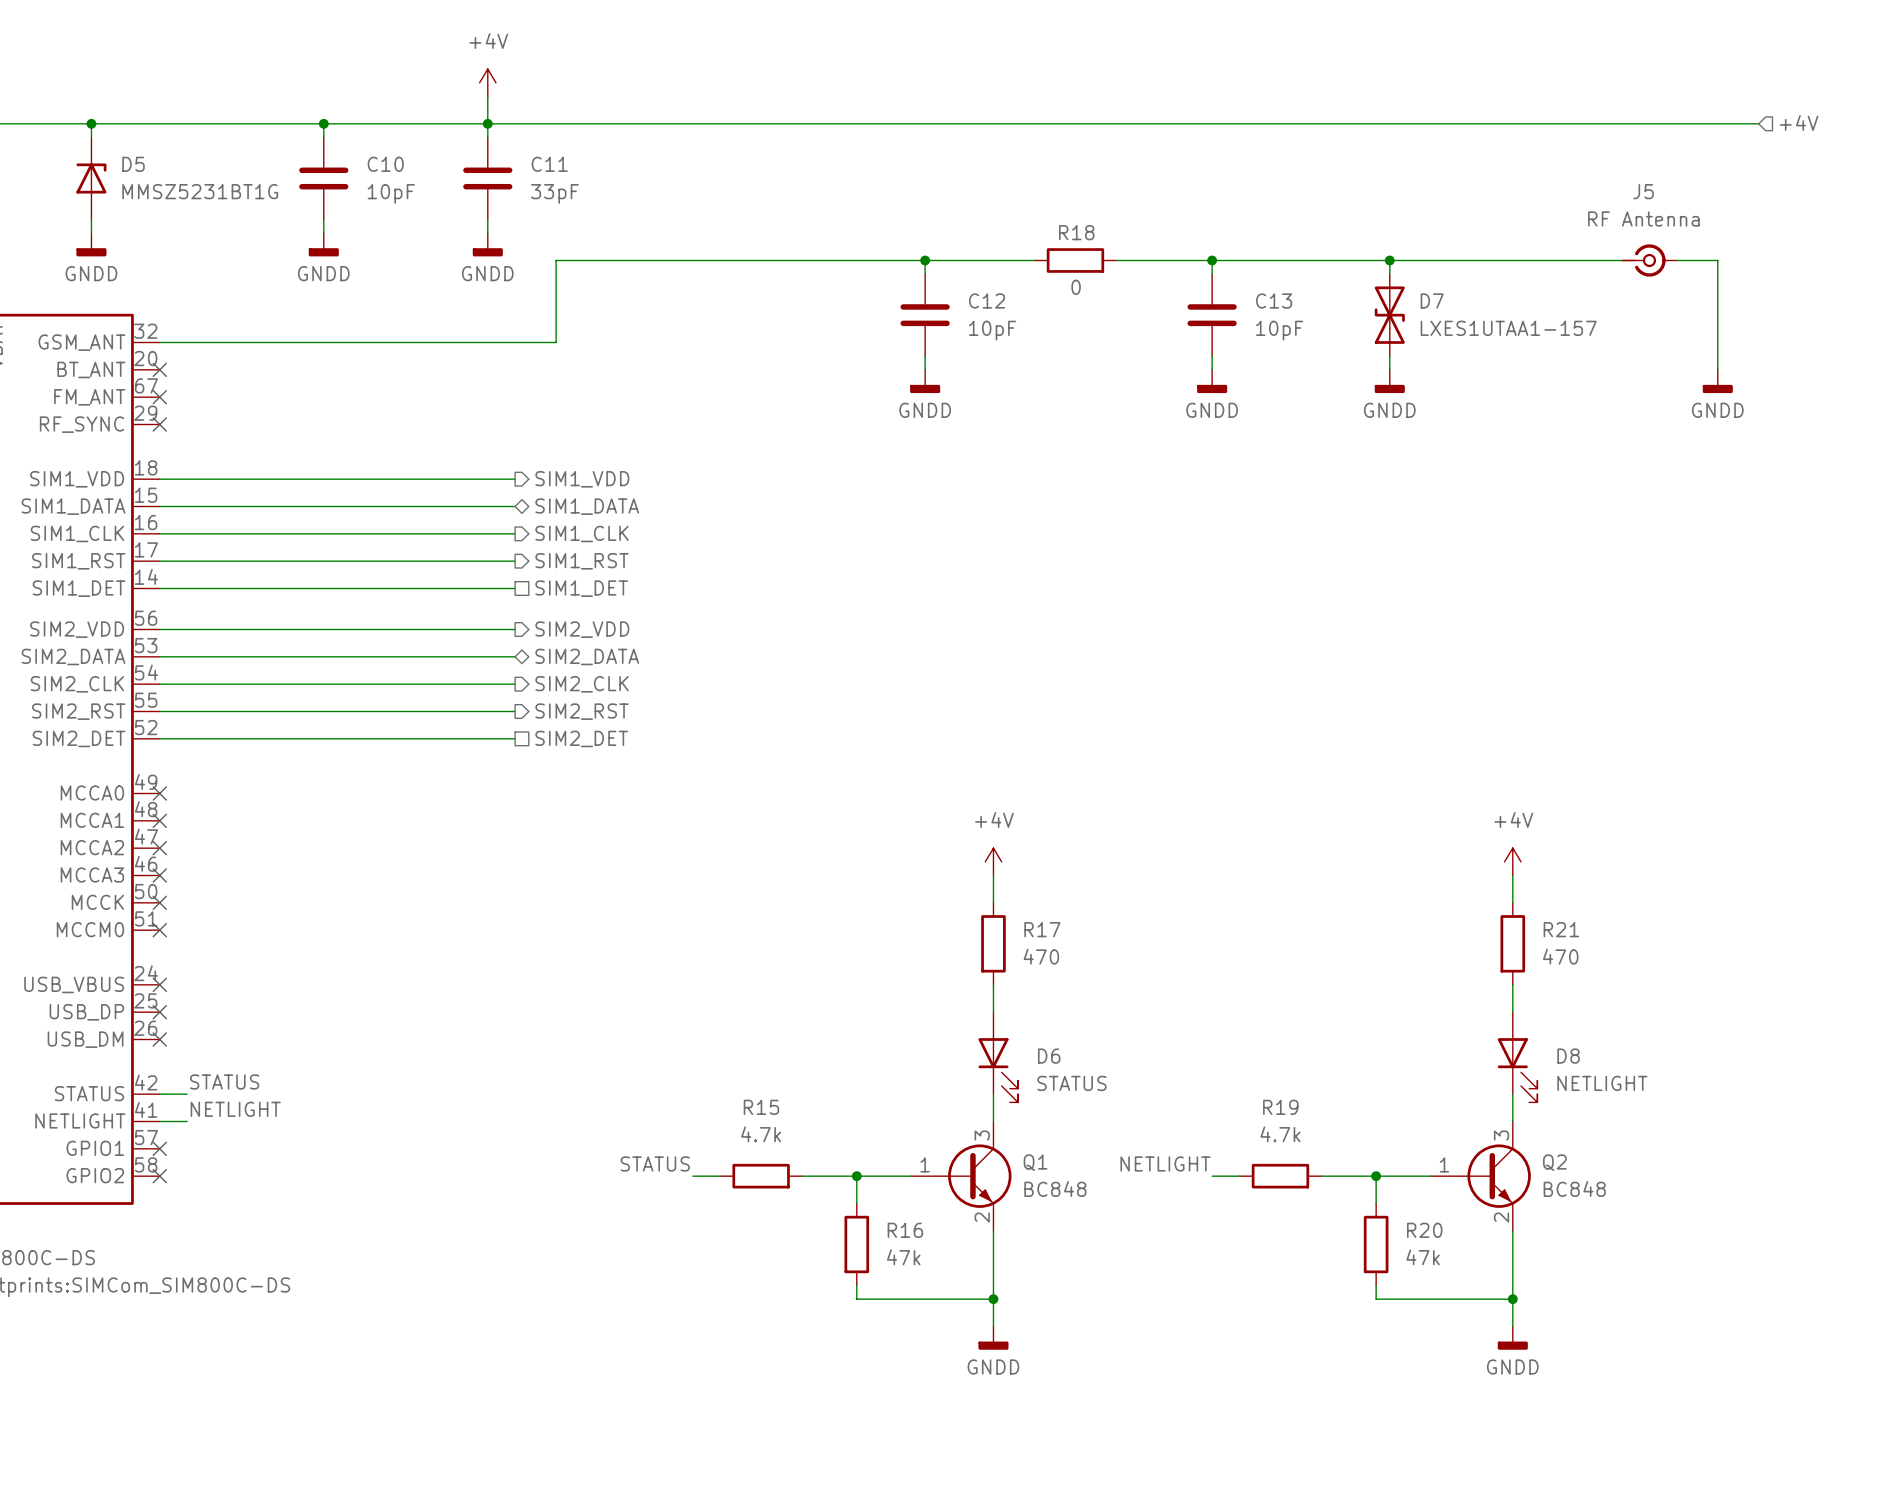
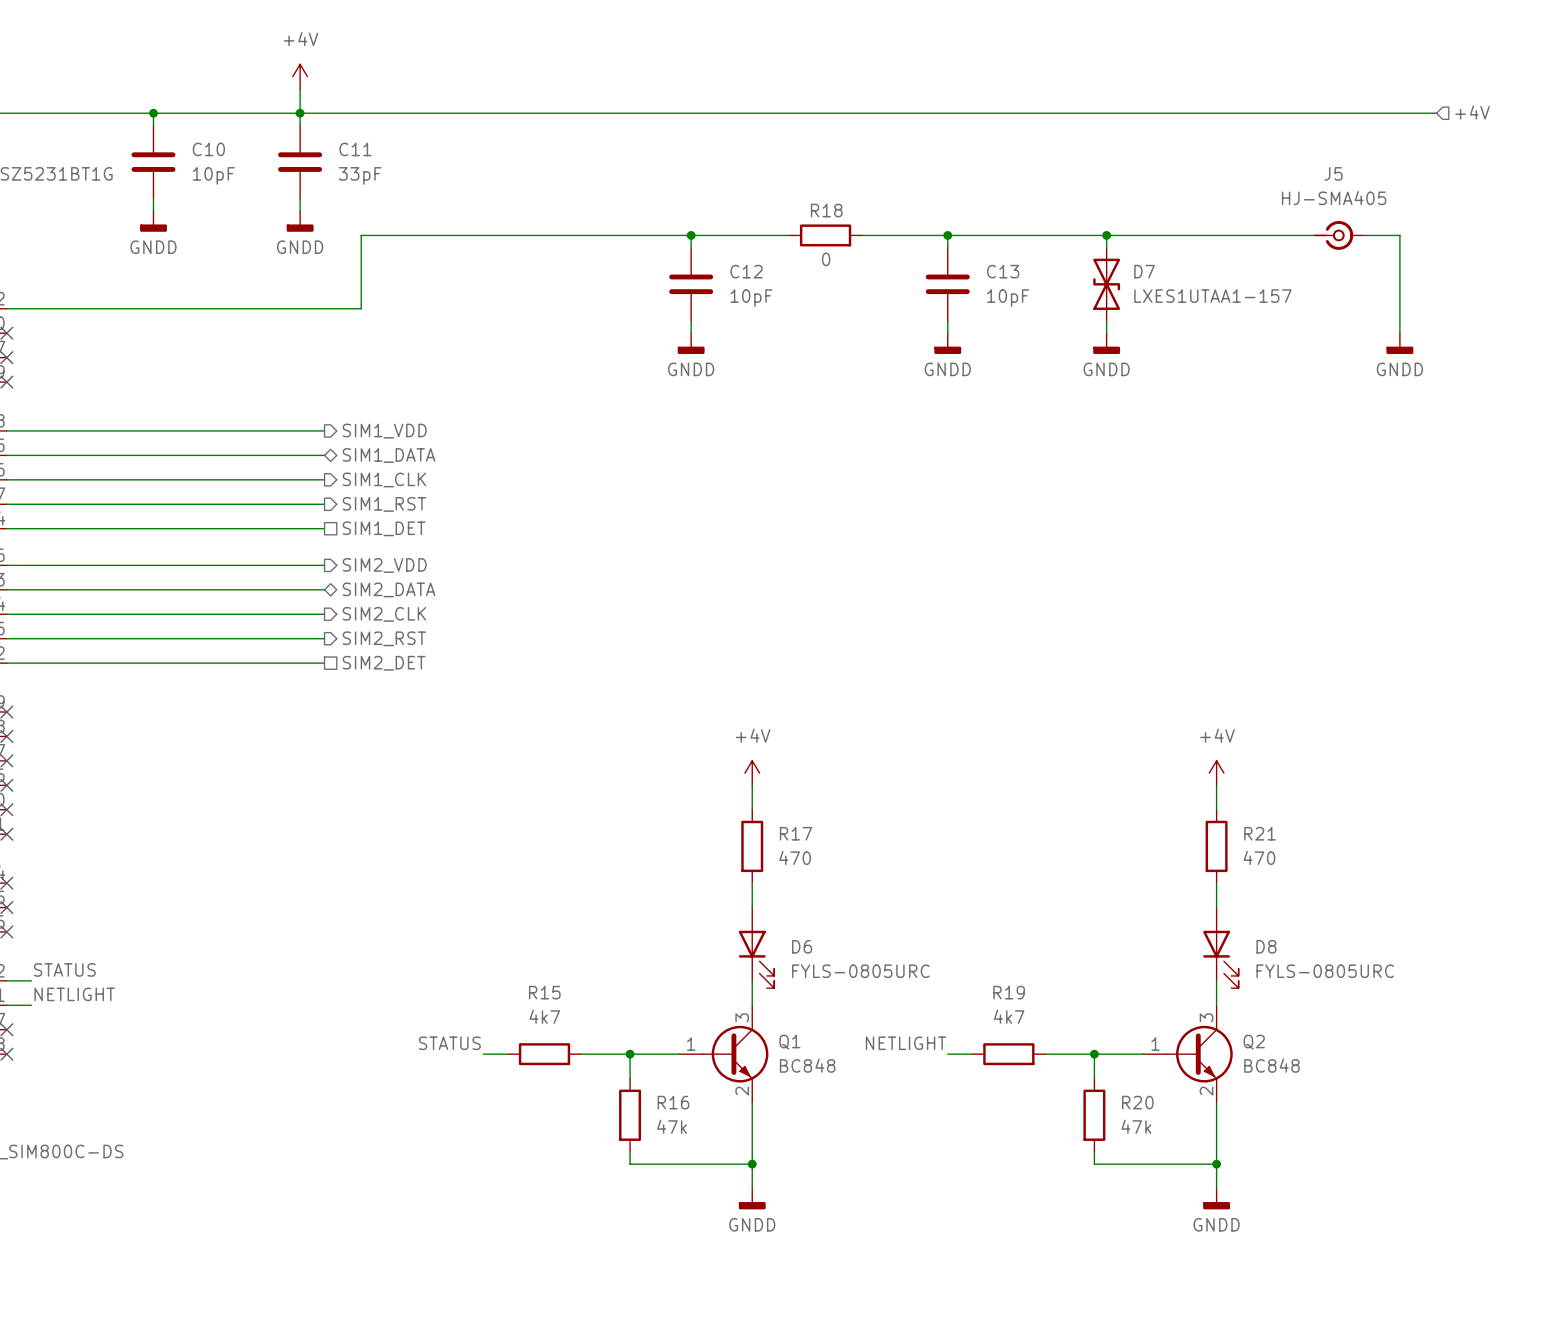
J5 value: RF Antenna (1643, 218) -> HJ-SMA405 (1334, 198)
D6 value: STATUS (1071, 1083) -> FYLS-0805URC (860, 971)
D8 value: NETLIGHT (1602, 1083) -> FYLS-0805URC (1325, 971)
R15 value: 4.7k (761, 1134) -> 4k7 (544, 1016)
R19 value: 4.7k (1280, 1134) -> 4k7 (1009, 1016)

